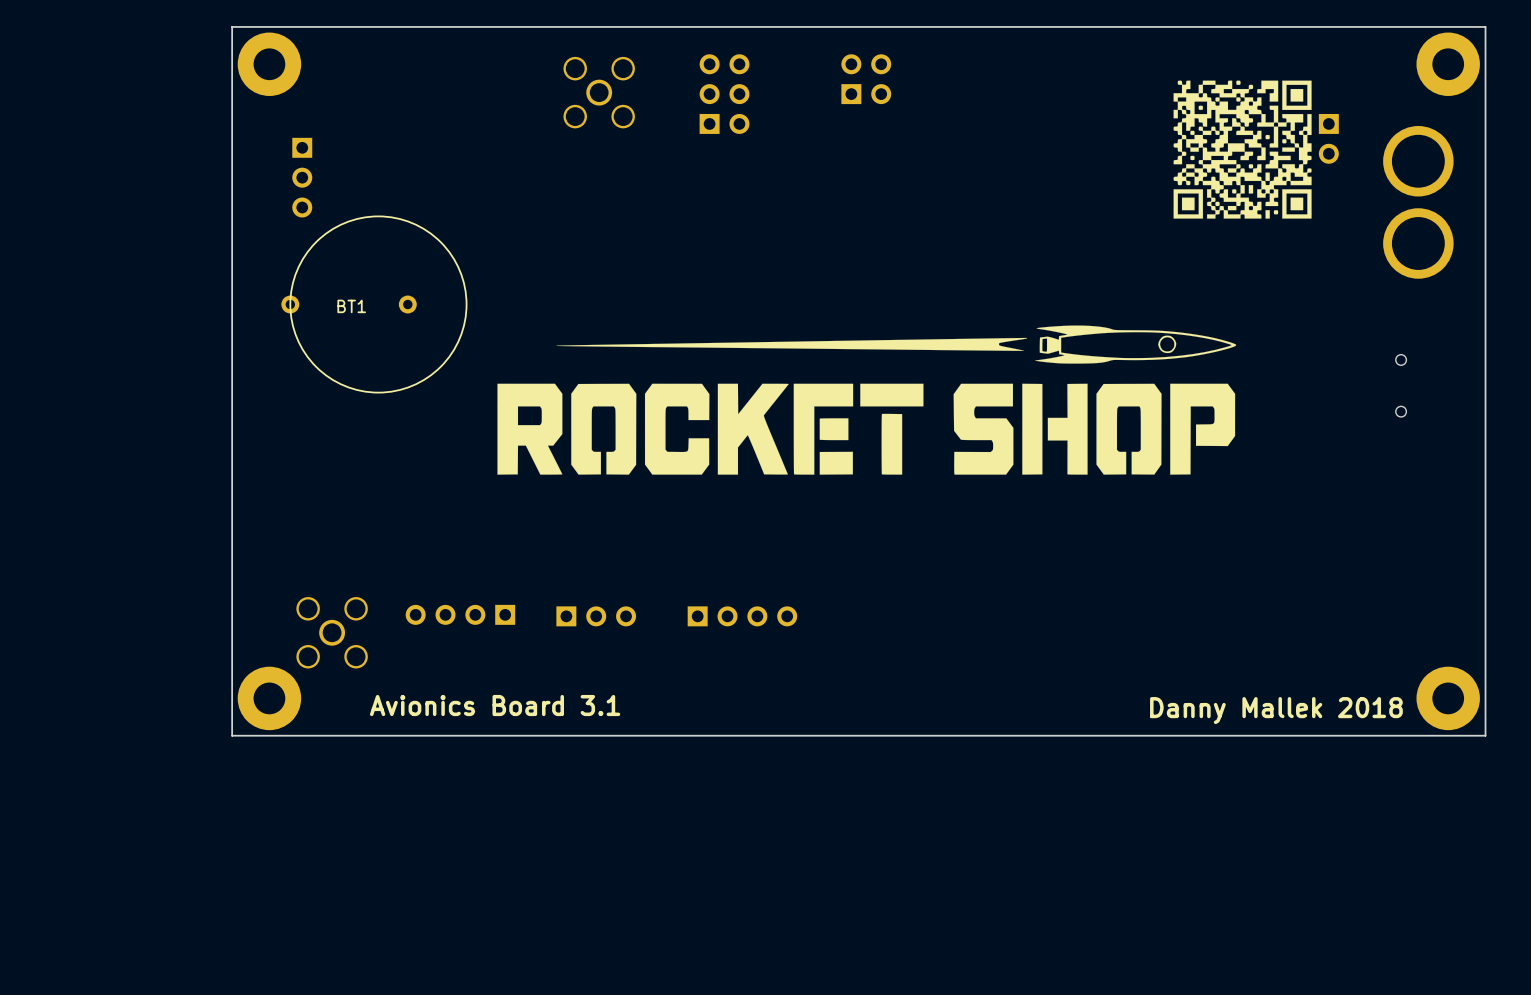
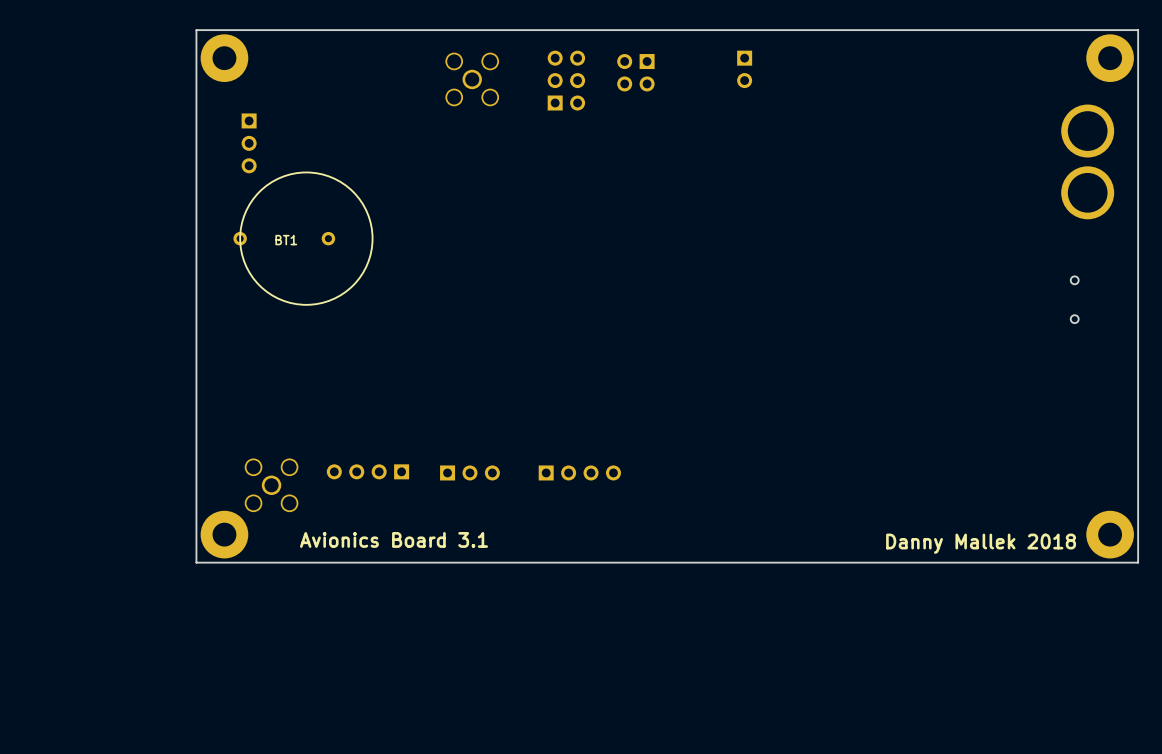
part rotation: 0° (866, 79) -> 180° (635, 72)
part position: (866, 79) -> (635, 72)
part: none -> (744, 69)
drawing: [1173, 80, 1312, 219] -> none
part: (1328, 138) -> none
drawing: [497, 325, 1237, 475] -> none

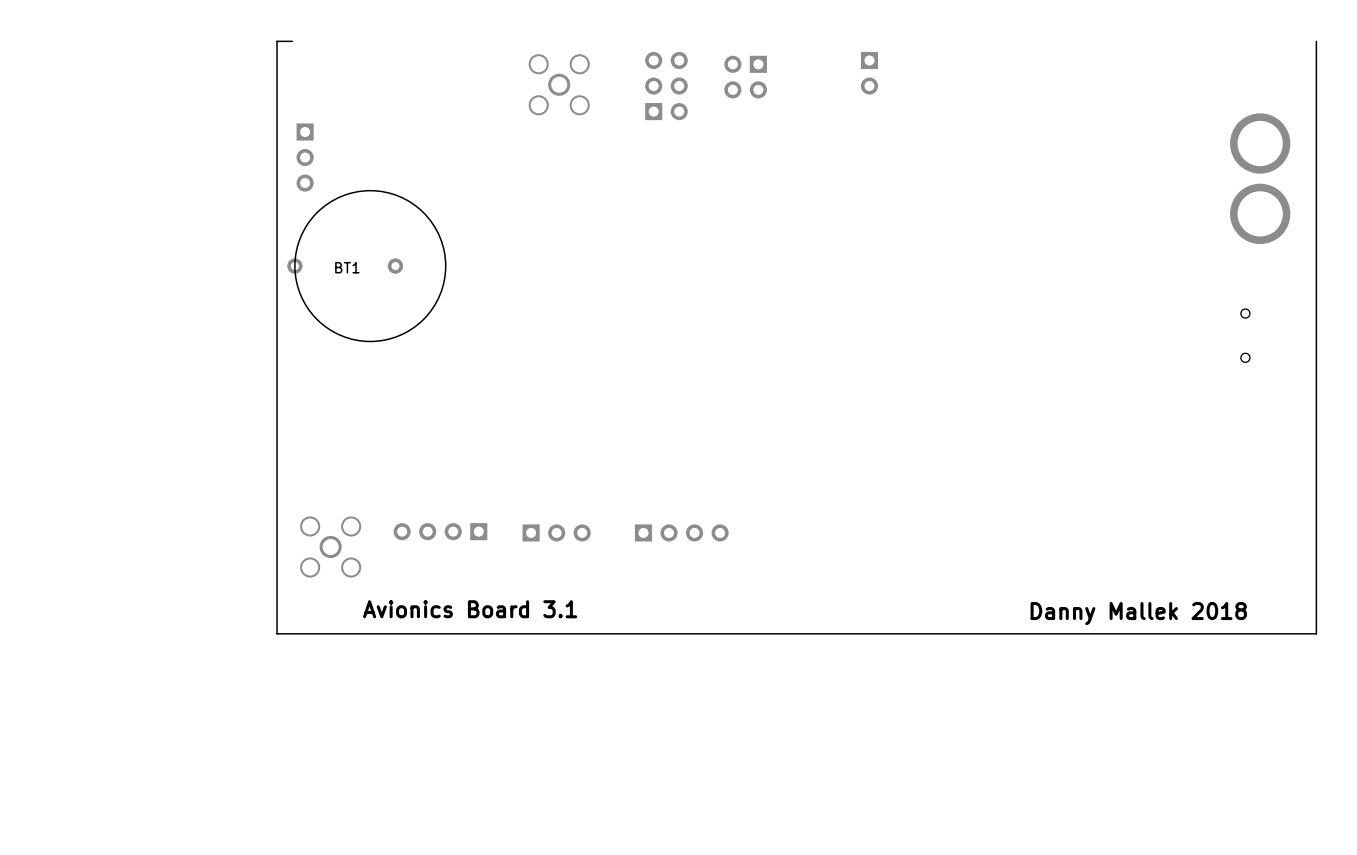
board edge: (1138, 30) (1138, 562) (196, 562) (196, 30) (1138, 30) -> none
board edge: none -> (1316, 41) (1316, 633) (277, 633) (277, 41) (292, 41)
part: (224, 58) -> none
part: (1110, 58) -> none
part: (224, 534) -> none
part: (1110, 534) -> none

